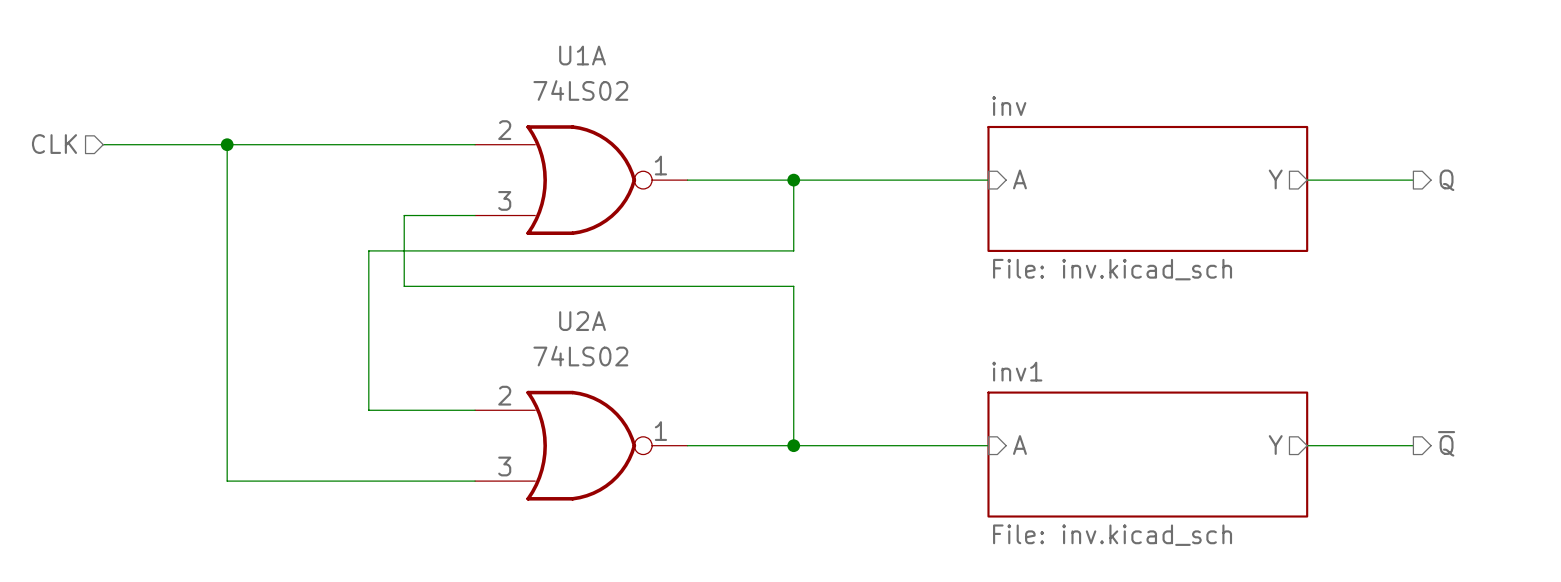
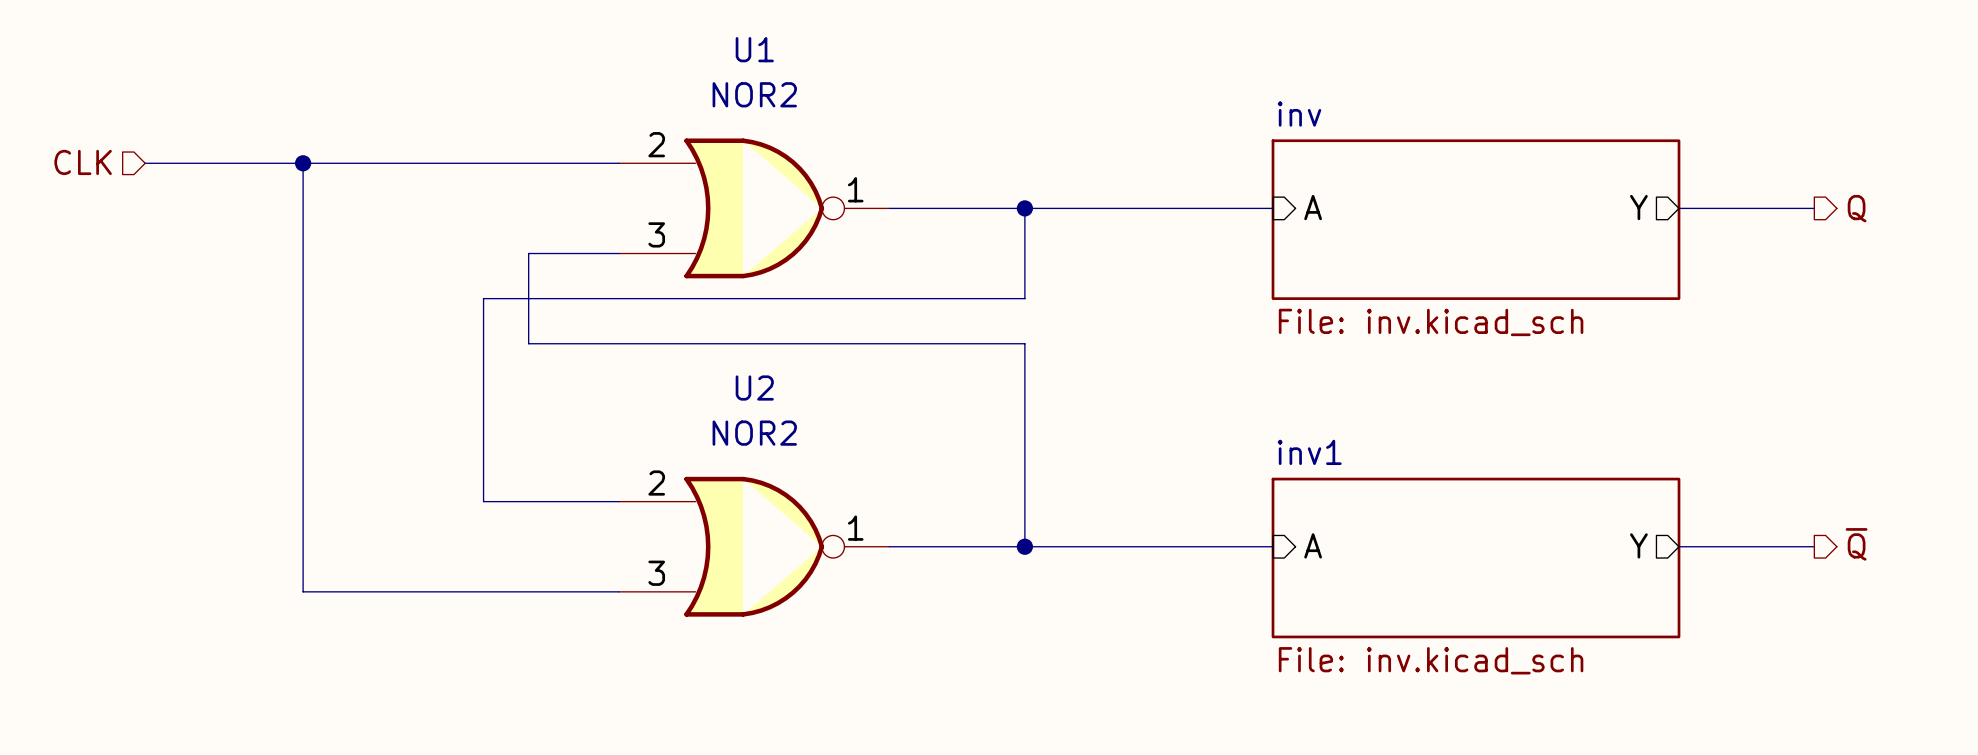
U1A name: U1A (582, 55) -> U1 (754, 49)
U1A value: 74LS02 (580, 90) -> NOR2 (754, 94)
U2A name: U2A (582, 321) -> U2 (754, 388)
U2A value: 74LS02 (580, 356) -> NOR2 (754, 433)

